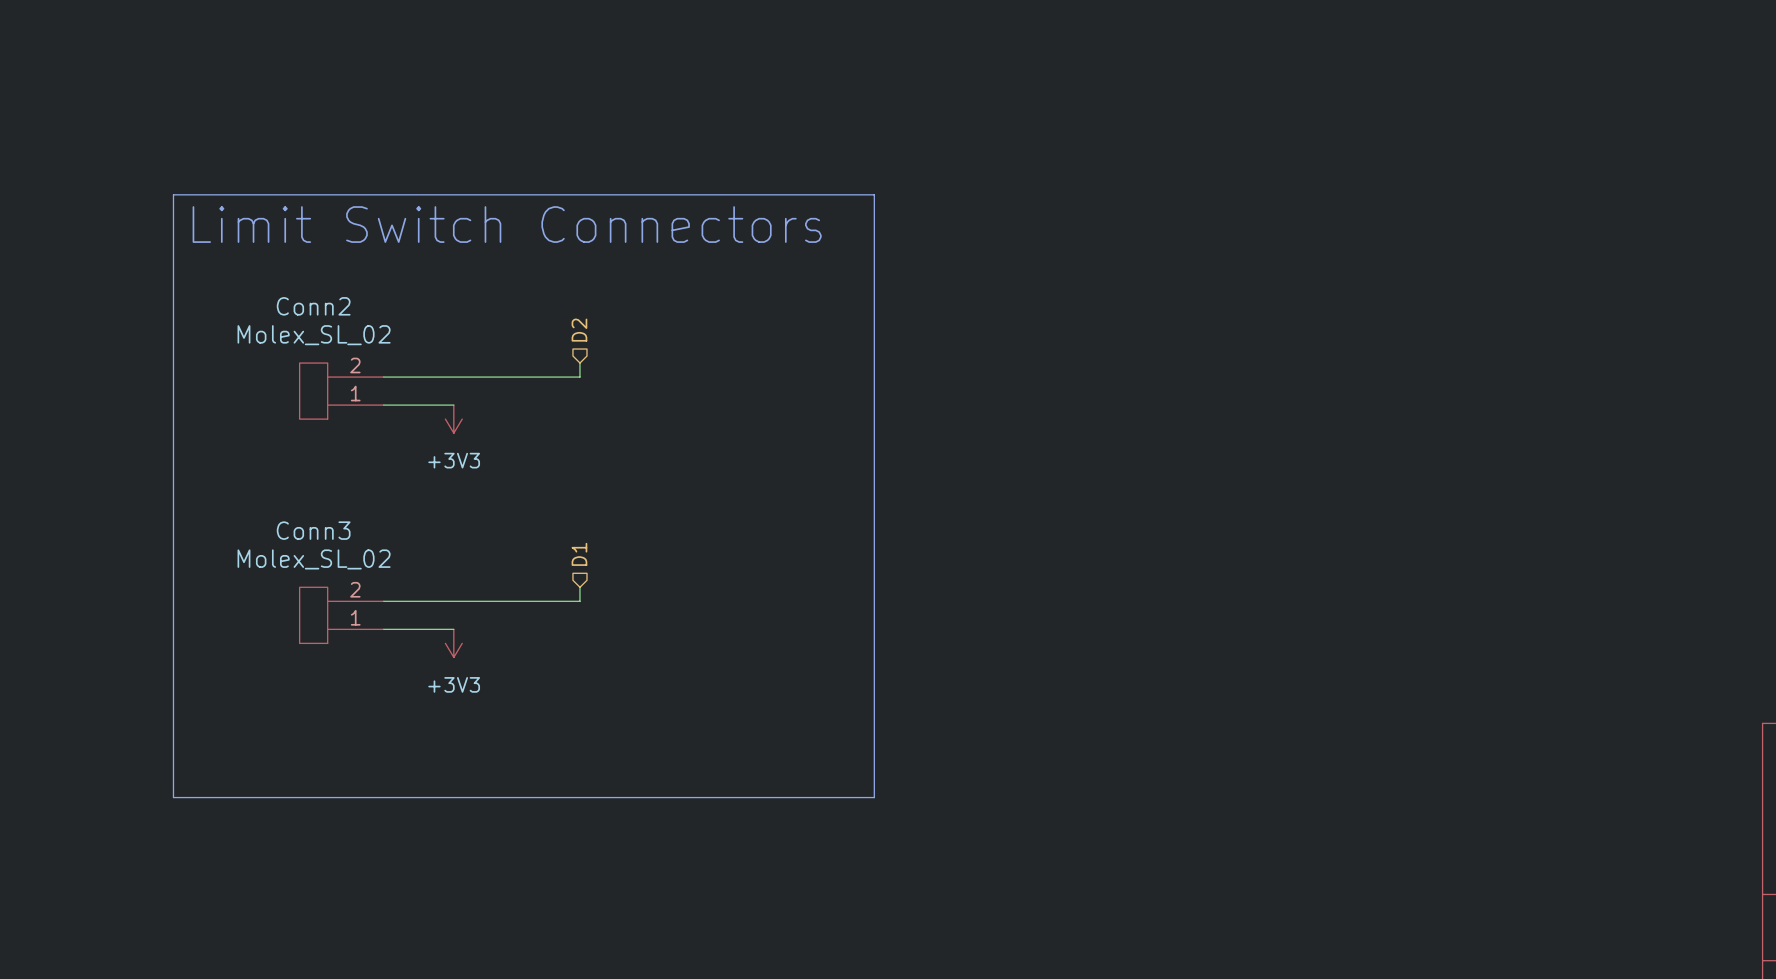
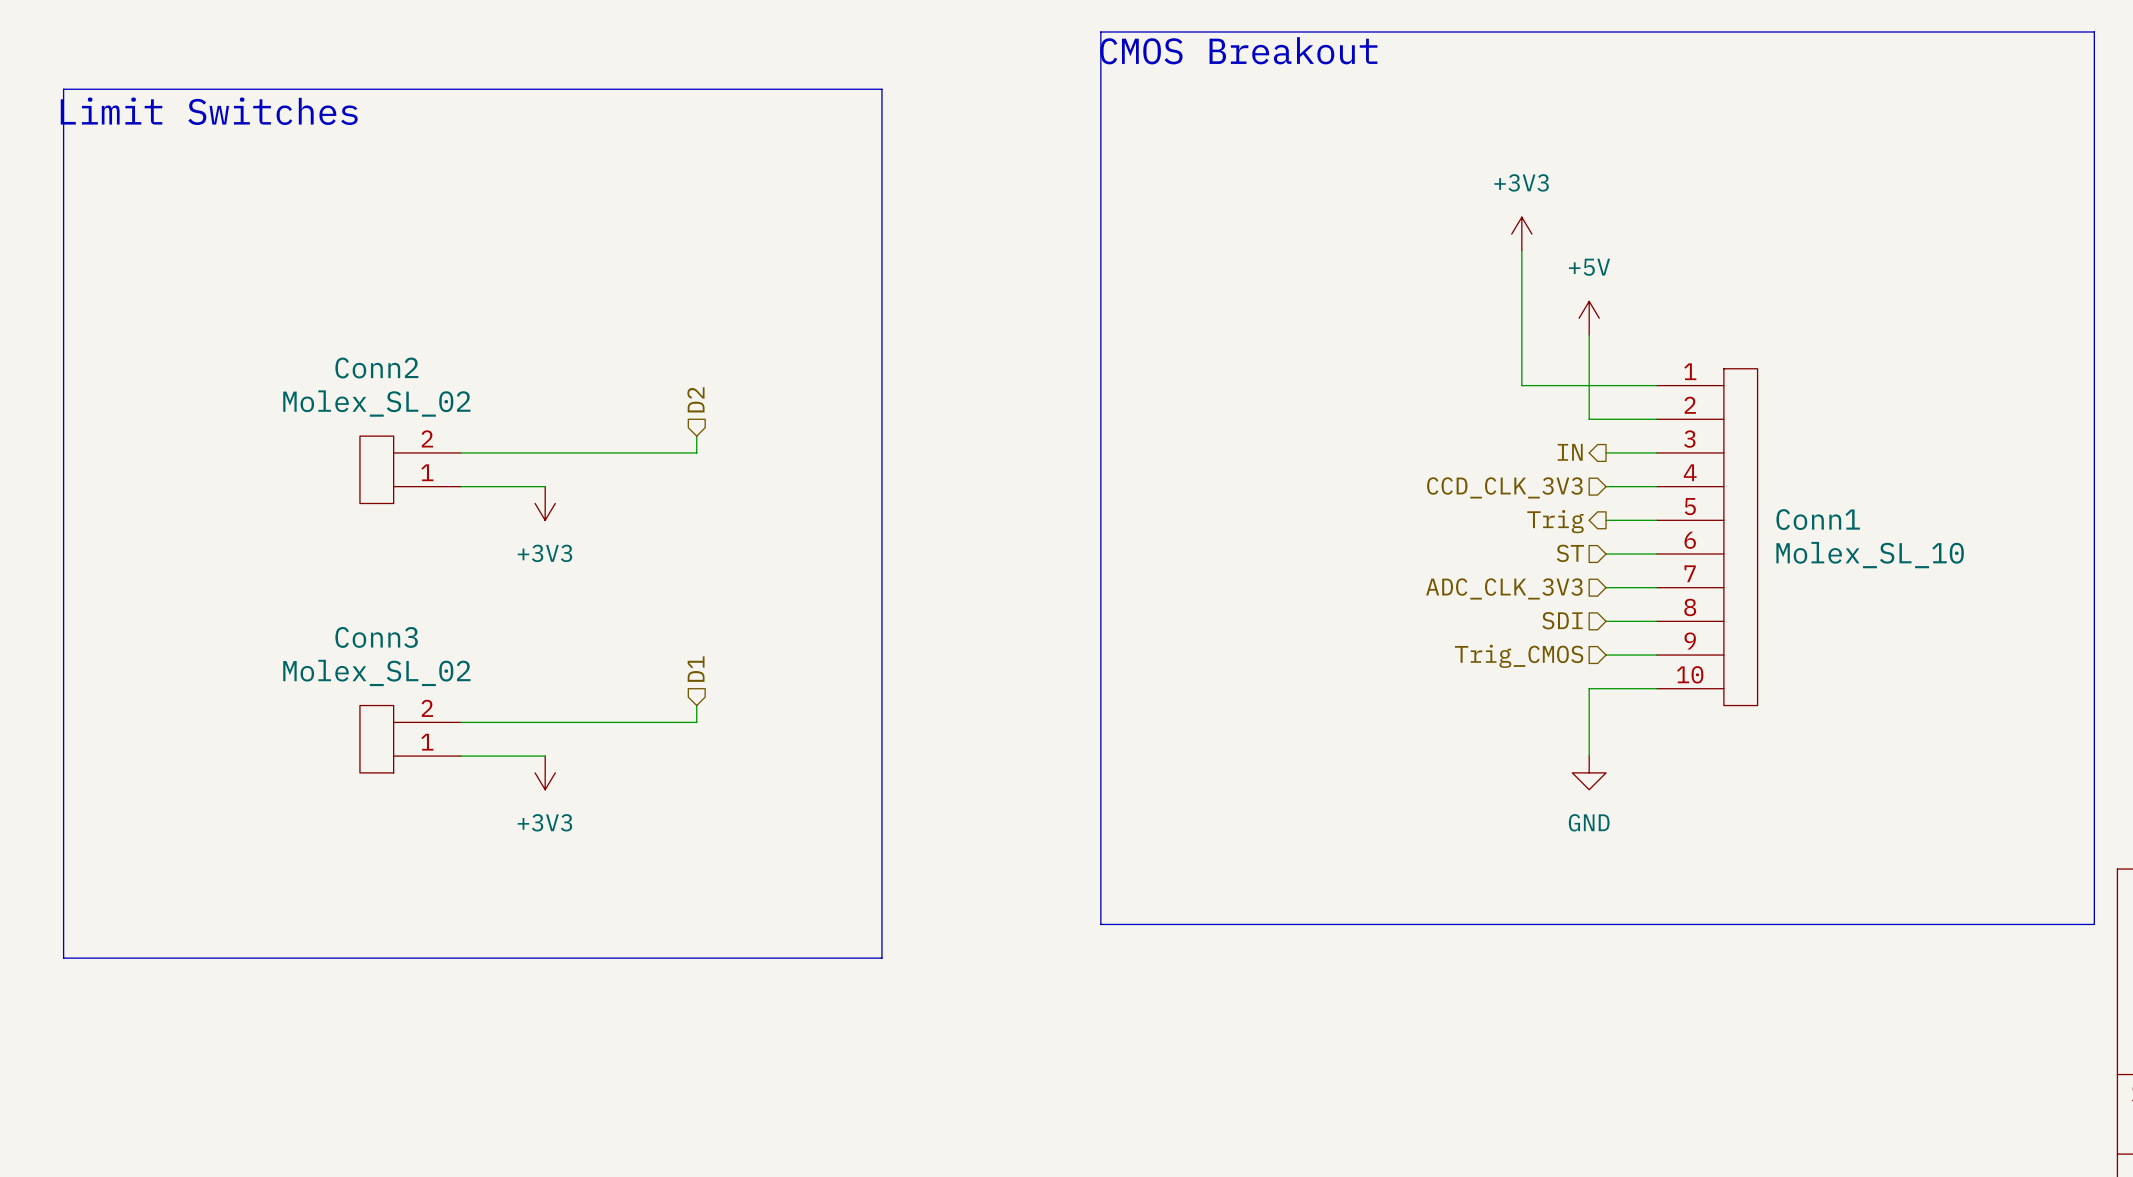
line: none -> (1100, 31) (2094, 31) (2094, 924) (1100, 924) (1100, 31)
text: none -> CMOS Breakout (1238, 50)
text: none -> Limit Switches (209, 111)
power symbol: none -> +3V3 (1521, 234)
wire: none -> (1521, 250) (1521, 385) (1656, 385)
text: Limit Switch Connectors (507, 224) -> none
power symbol: none -> +5V (1589, 318)
wire: none -> (1589, 335) (1589, 419) (1656, 419)
hierarchical label: none -> IN (1570, 452)
wire: none -> (1606, 452) (1656, 452)
hierarchical label: none -> CCD_CLK_3V3 (1504, 487)
wire: none -> (1606, 486) (1656, 486)
wire: none -> (1606, 520) (1656, 520)
hierarchical label: none -> Trig (1555, 521)
Conn1: none -> Molex_SL_10 (1707, 537)
hierarchical label: none -> ST (1570, 553)
wire: none -> (1606, 554) (1656, 554)
hierarchical label: none -> ADC_CLK_3V3 (1504, 588)
wire: none -> (1606, 587) (1656, 587)
hierarchical label: none -> SDI (1562, 620)
wire: none -> (1606, 621) (1656, 621)
wire: none -> (1606, 655) (1656, 655)
hierarchical label: none -> Trig_CMOS (1519, 656)
wire: none -> (1656, 688) (1589, 688) (1589, 756)
power symbol: none -> GND (1589, 772)
line: (173, 797) (173, 194) (874, 194) (874, 797) (734, 797) -> (208, 958) (63, 958) (63, 89) (881, 89) (881, 958)

